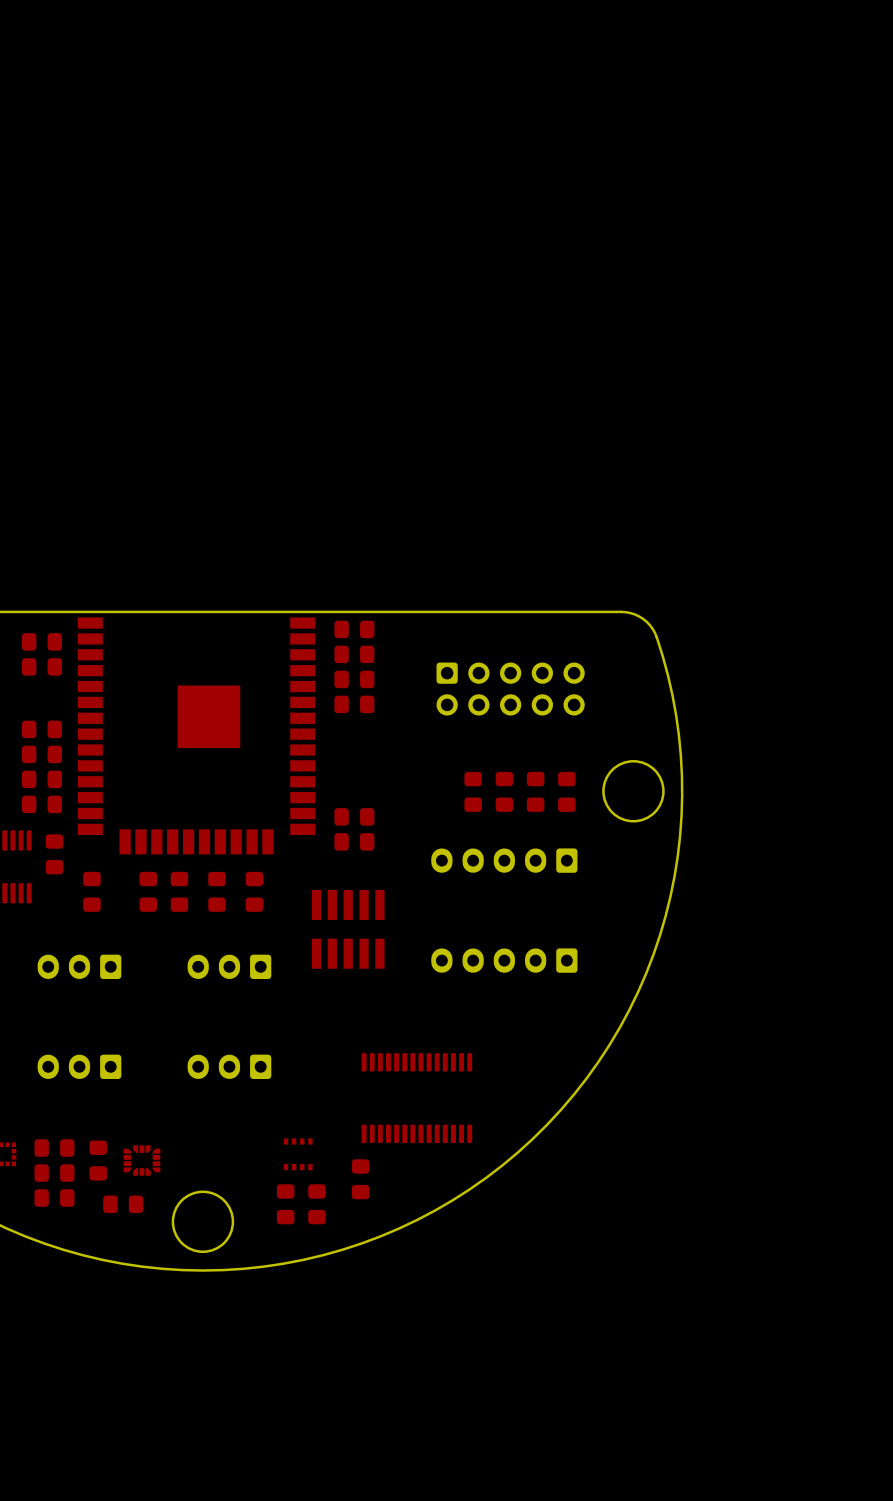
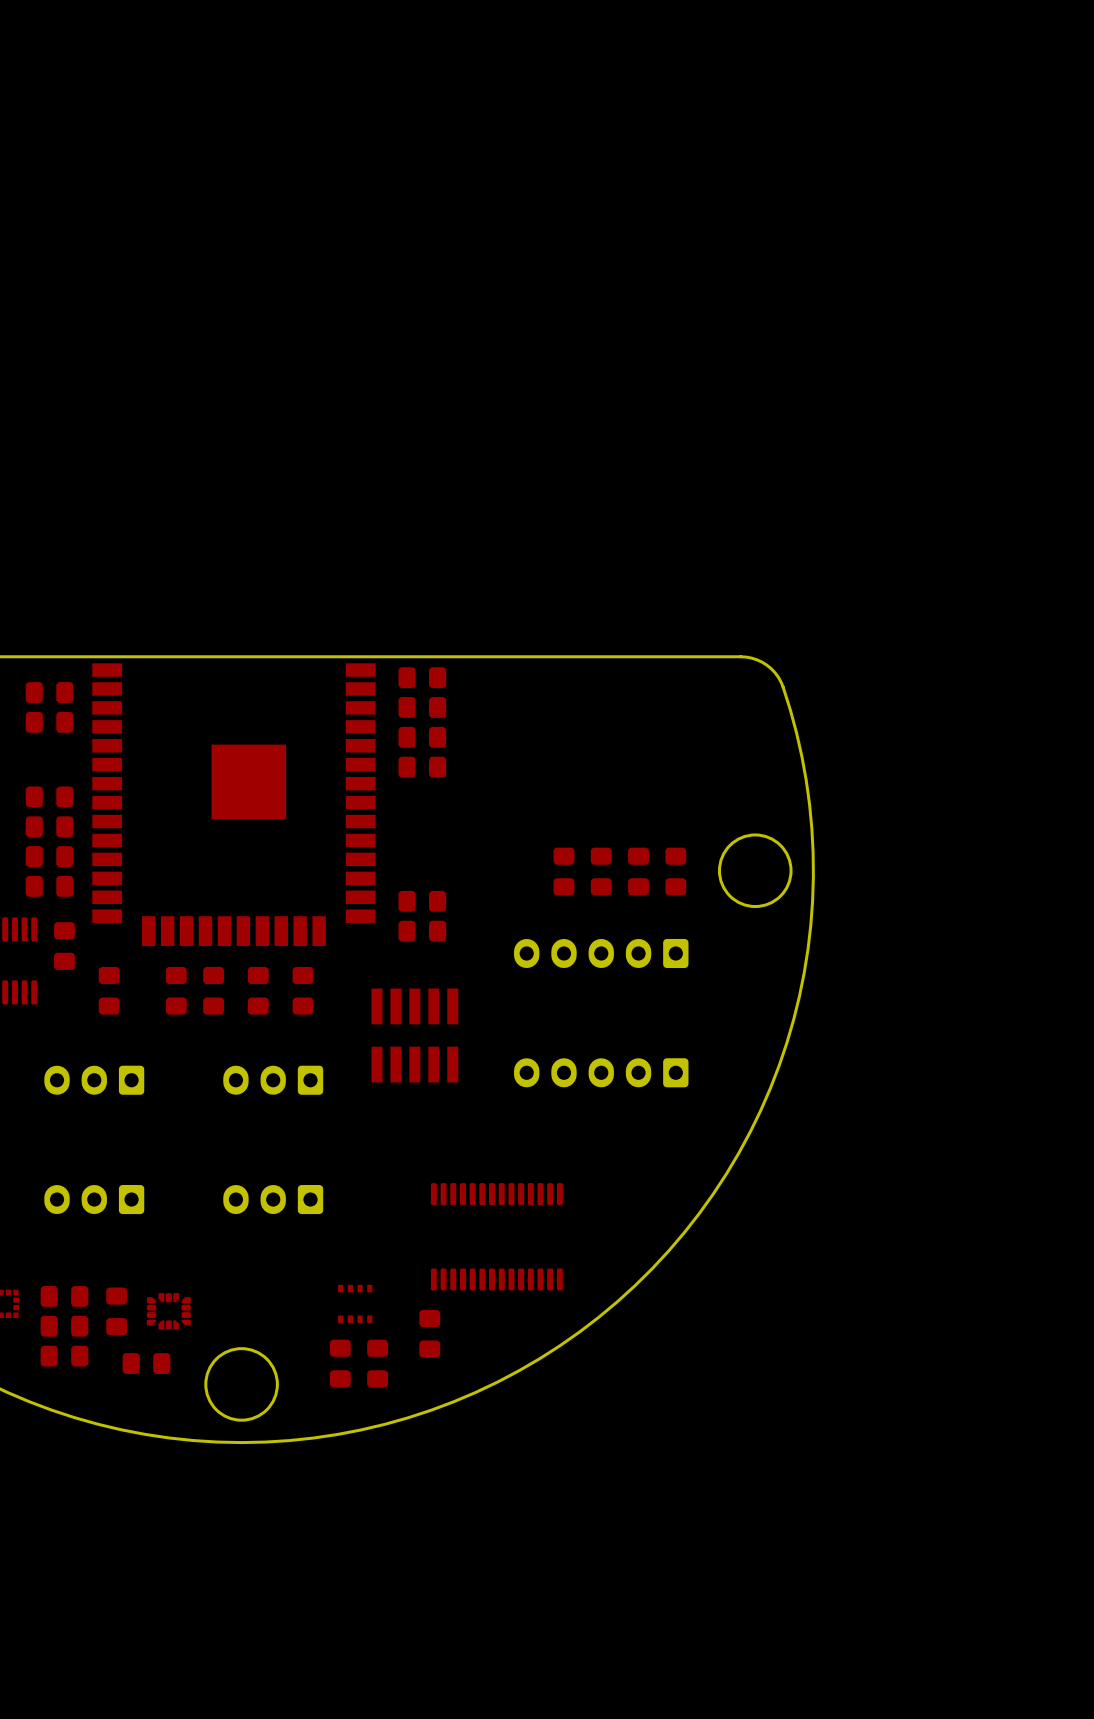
part: (510, 689) -> none

